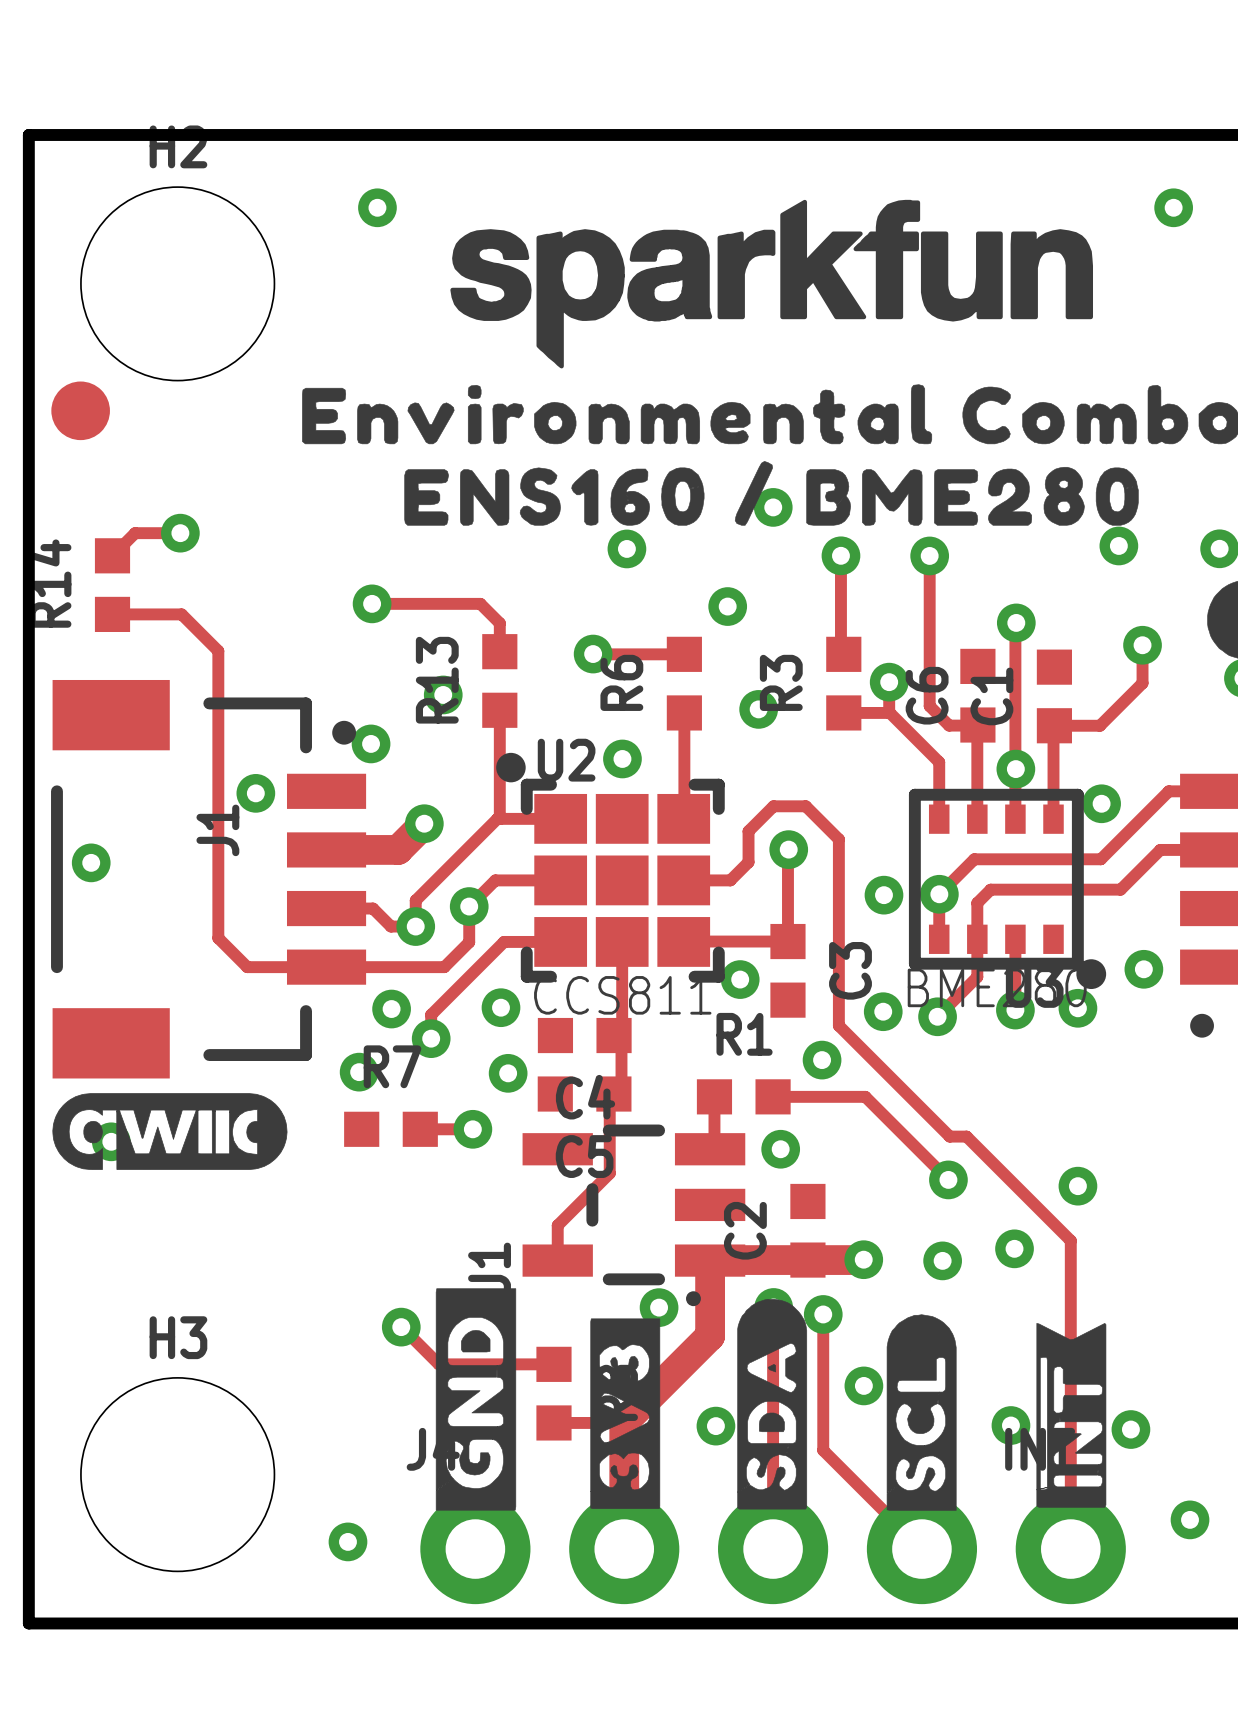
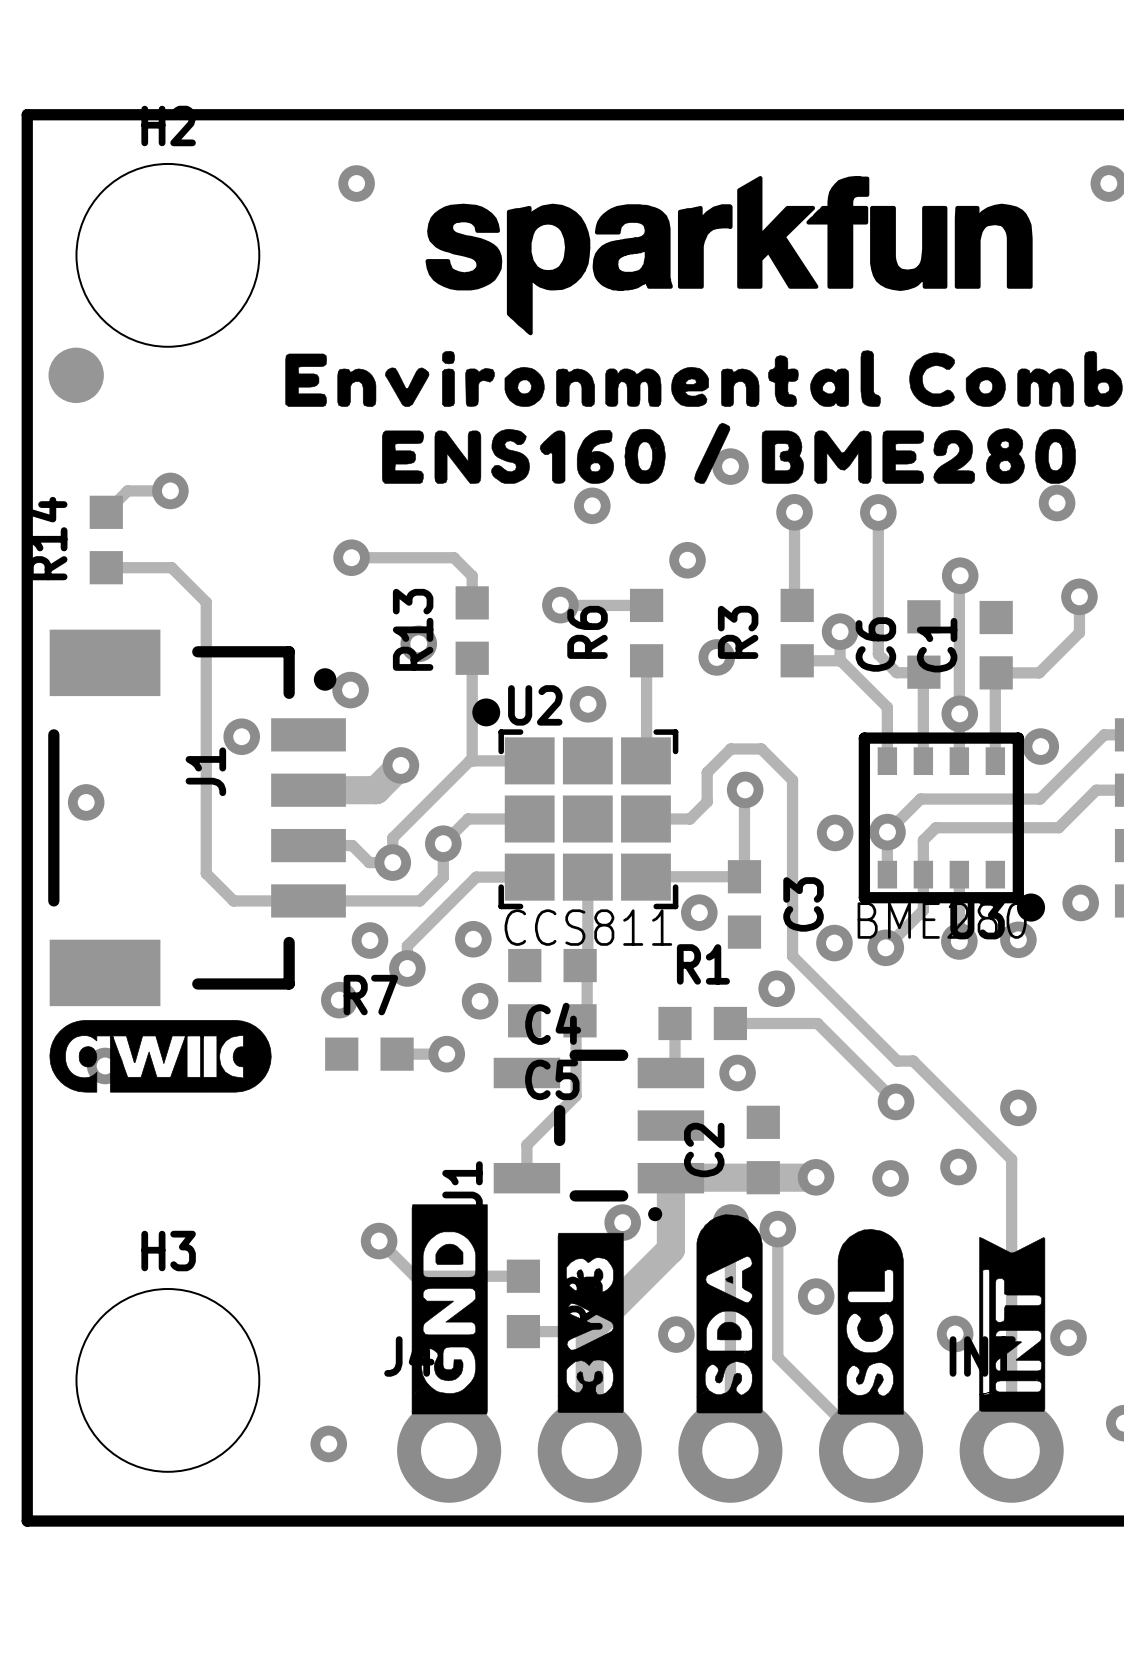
U2 footprint: [496, 752, 725, 983] -> [472, 698, 679, 910]

